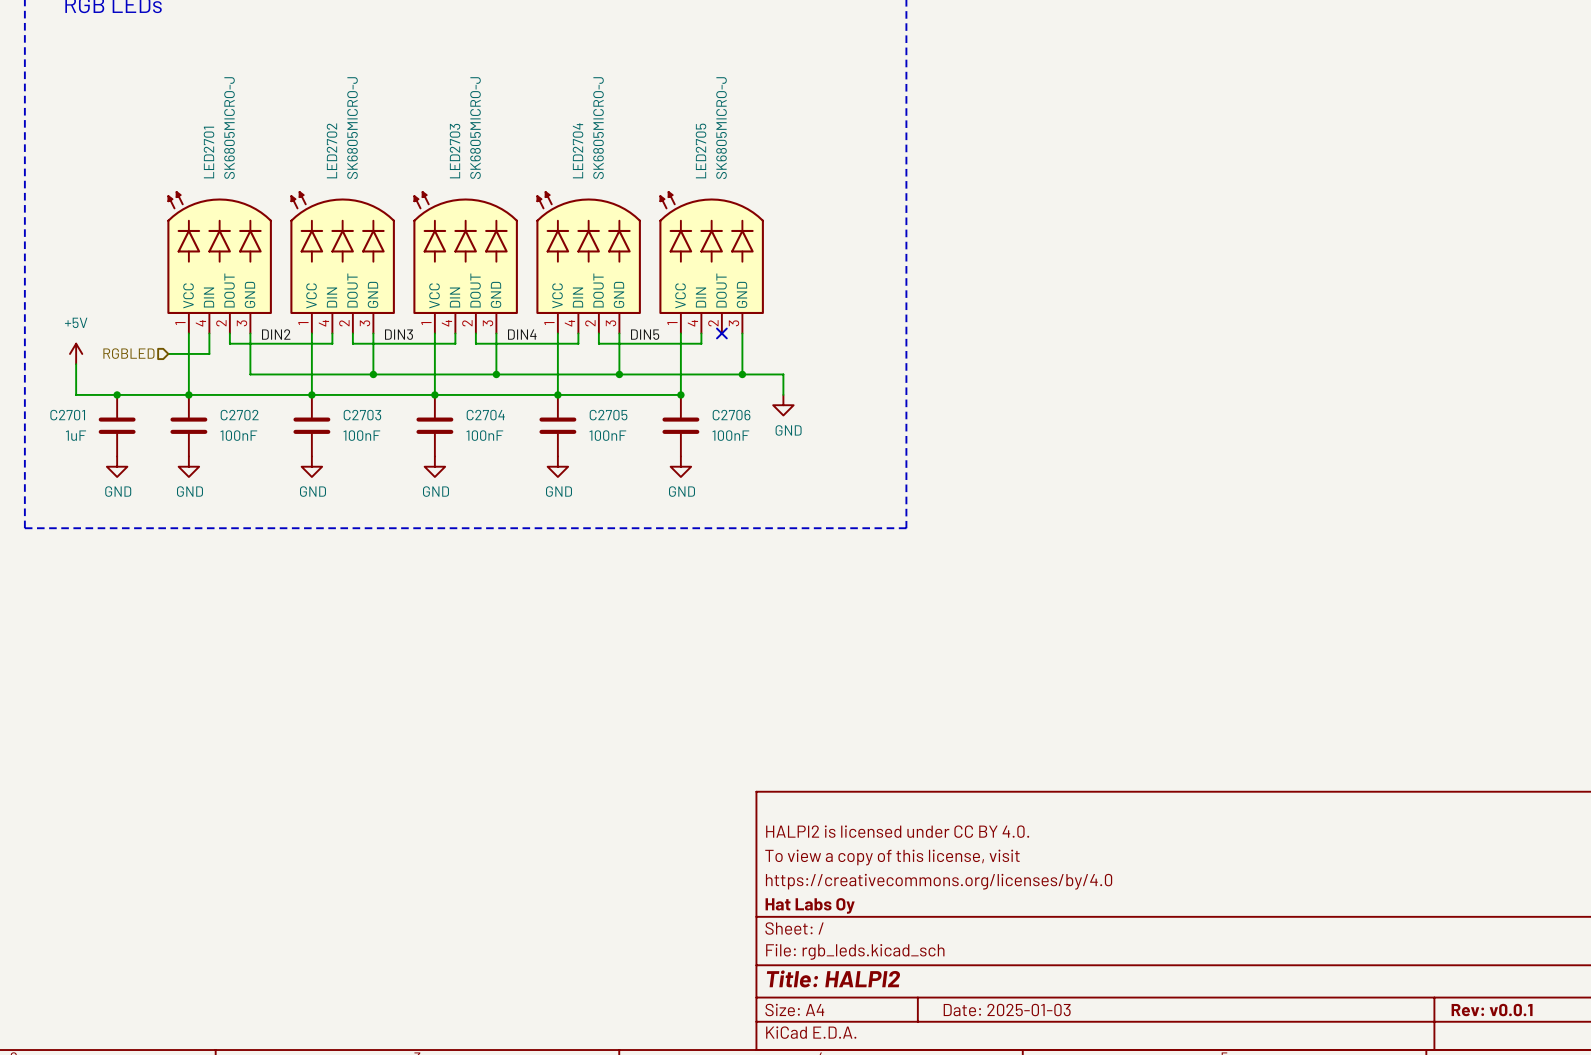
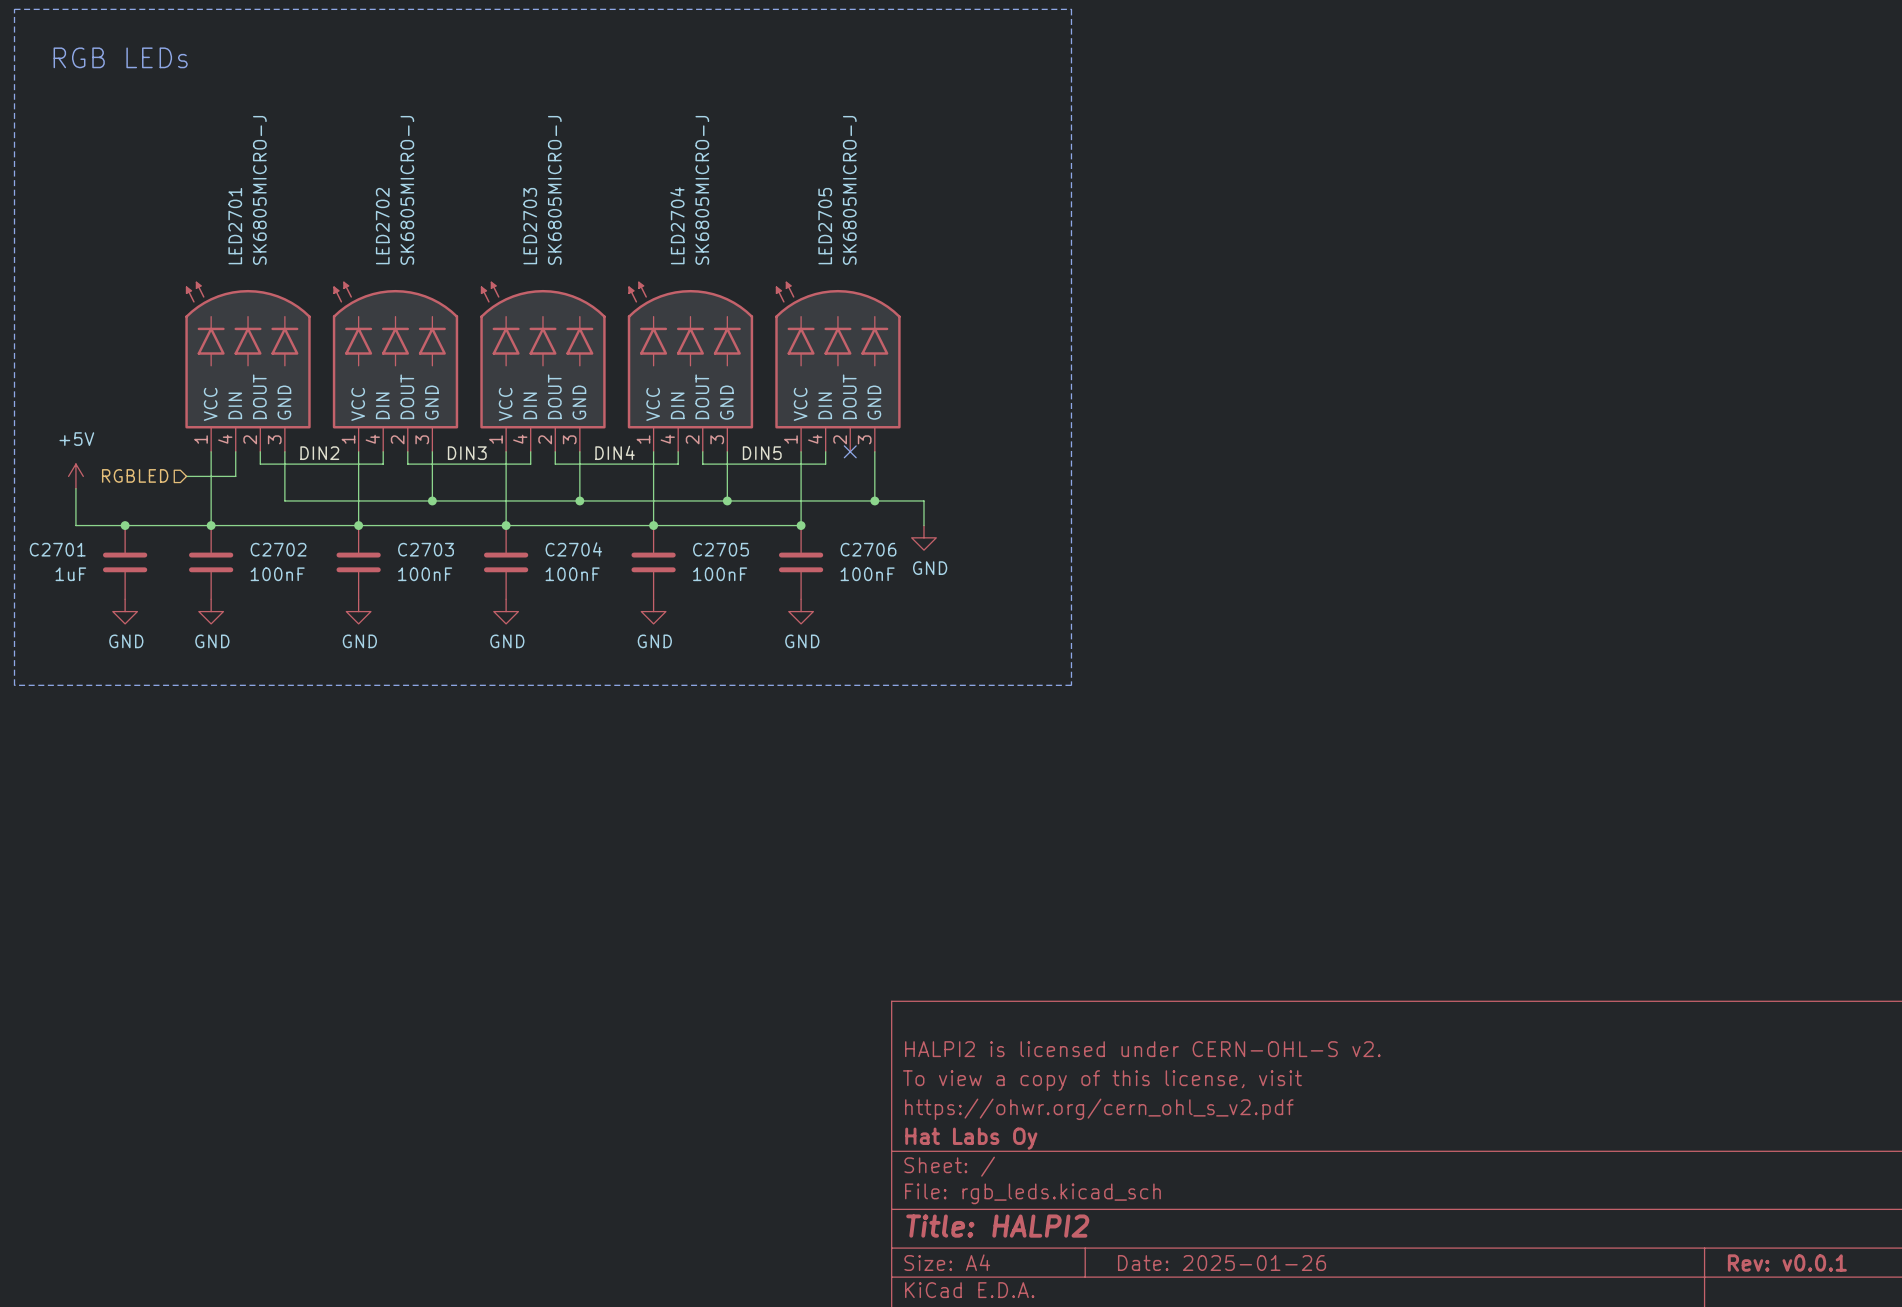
title block: HALPI2 is licensed under CC BY 4.0. (897, 831) -> HALPI2 is licensed under CERN-OHL-S v2. (1142, 1049)
title block: https://creativecommons.org/licenses/by/4.0 (939, 881) -> https://ohwr.org/cern_ohl_s_v2.pdf (1099, 1109)
title block: Date: 2025-01-03 (1007, 1010) -> Date: 2025-01-26 (1222, 1263)

